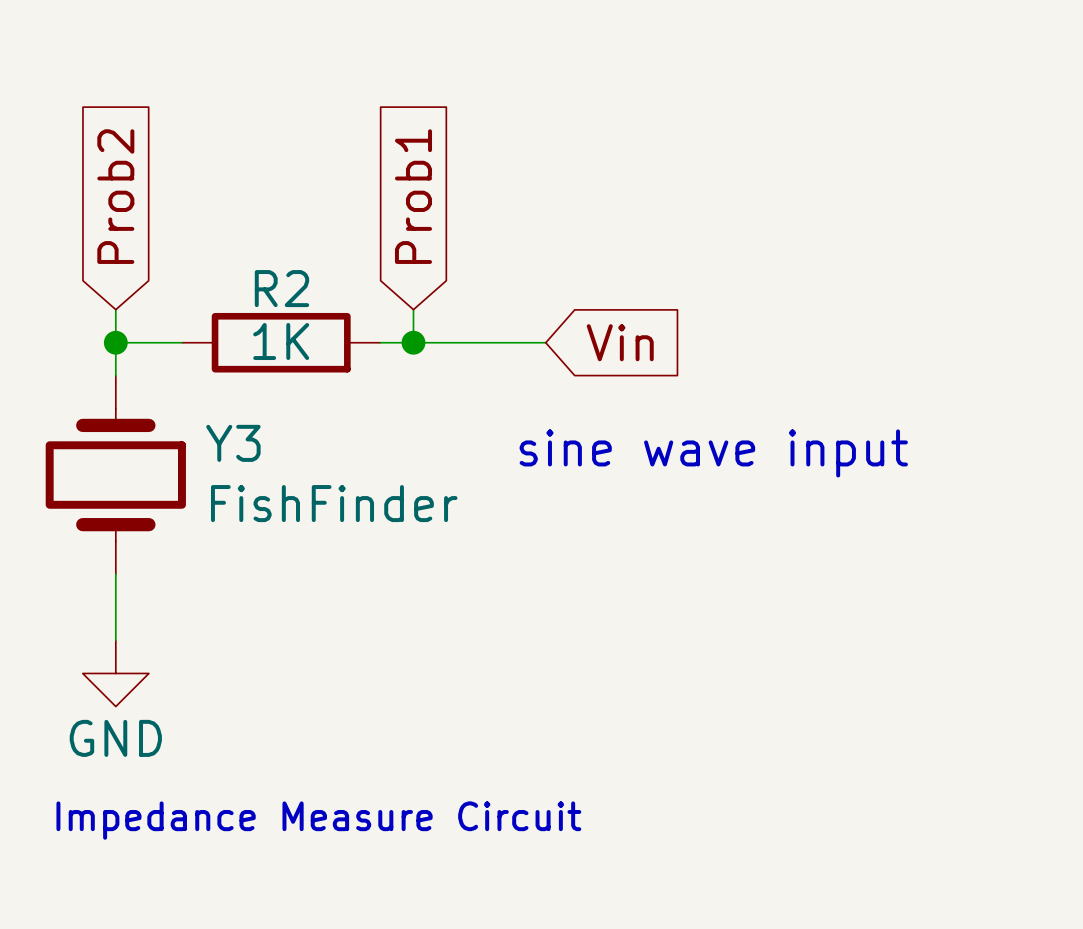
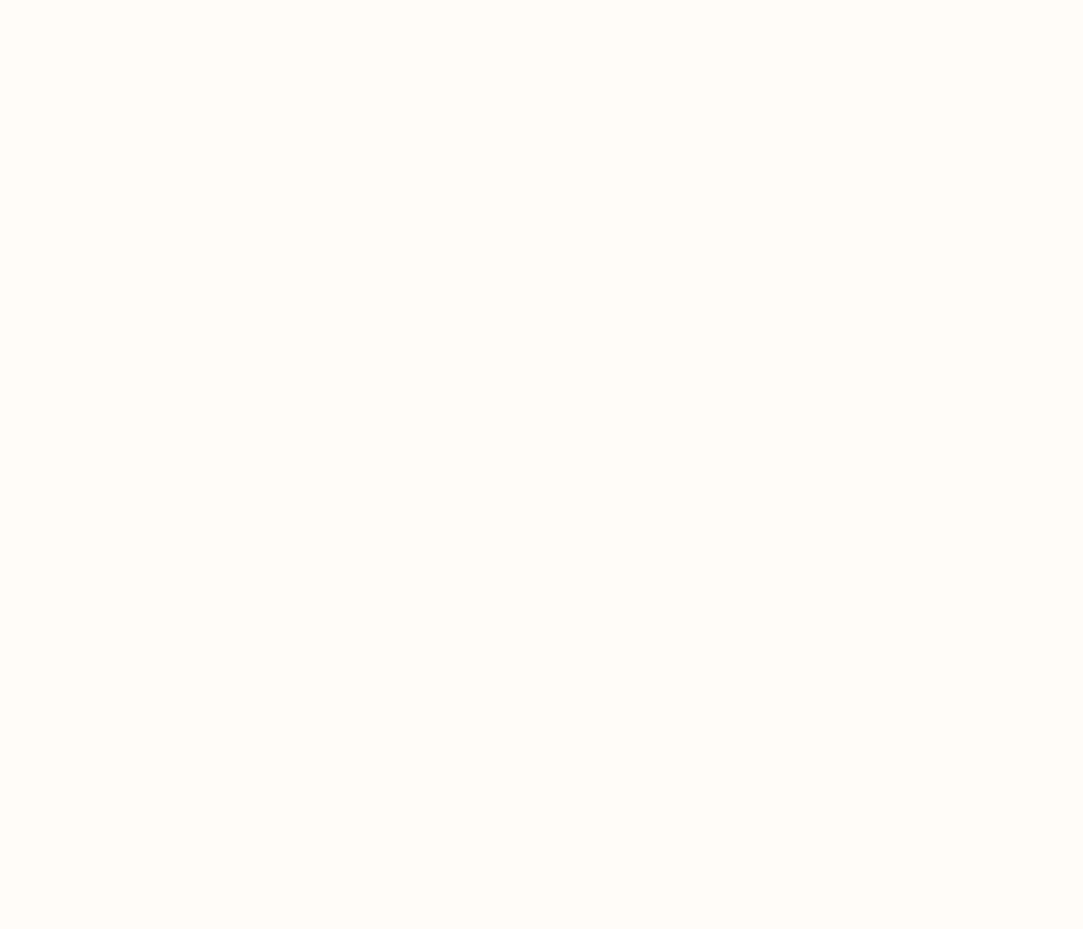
global label: Prob2 (115, 196) -> none
global label: Prob1 (413, 196) -> none
wire: (115, 309) (115, 375) -> none
wire: (413, 309) (413, 342) -> none
wire: (115, 342) (181, 342) -> none
junction: (115, 342) -> none
R2: 1K (281, 342) -> none
wire: (380, 342) (545, 342) -> none
junction: (413, 342) -> none
global label: Vin (620, 342) -> none
text: sine wave input (713, 453) -> none
Y3: FishFinder (115, 475) -> none
wire: (115, 574) (115, 640) -> none
power symbol: GND (115, 673) -> none
text: Impedance Measure Circuit (318, 820) -> none

